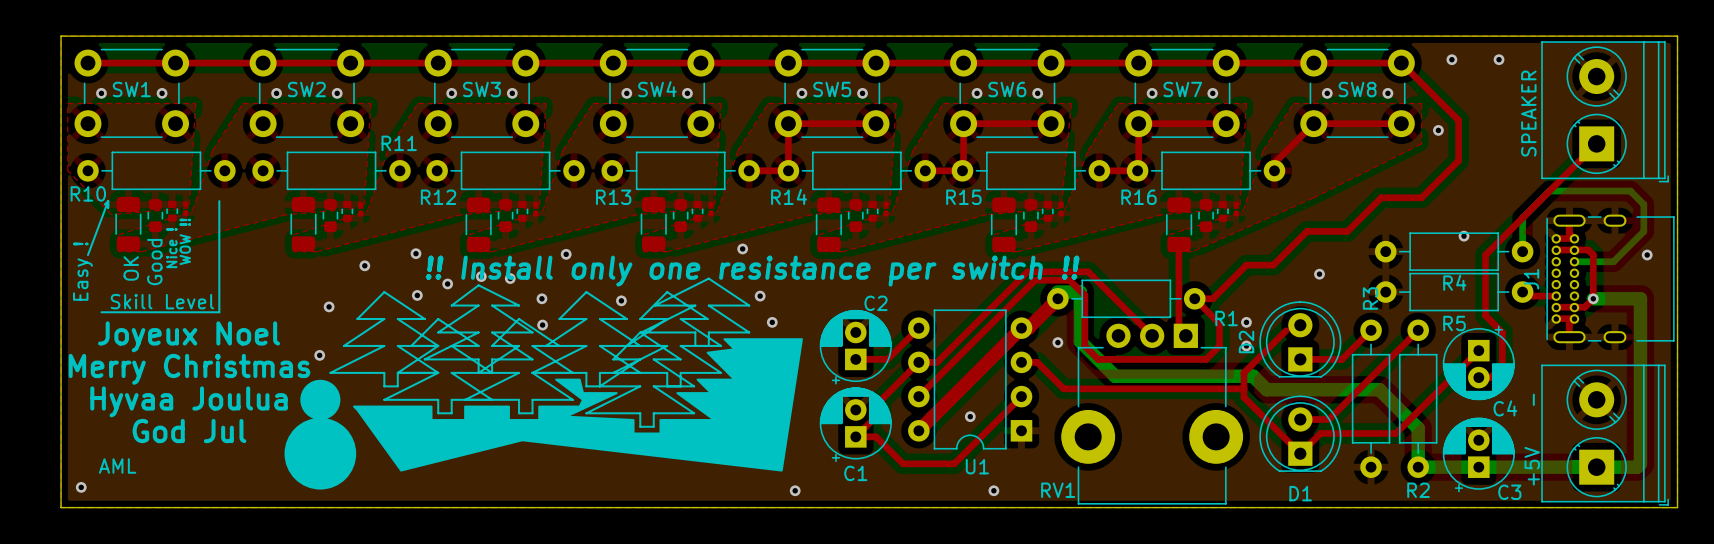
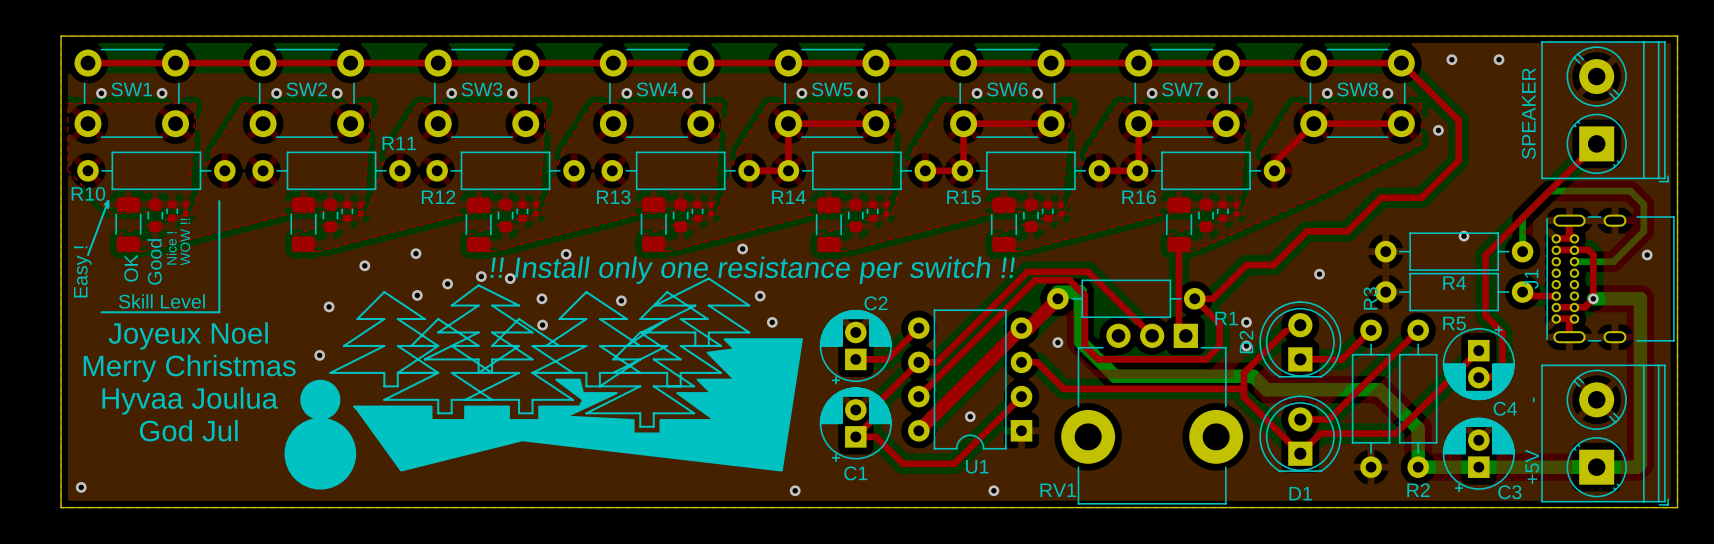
text: AML (117, 466) -> none

